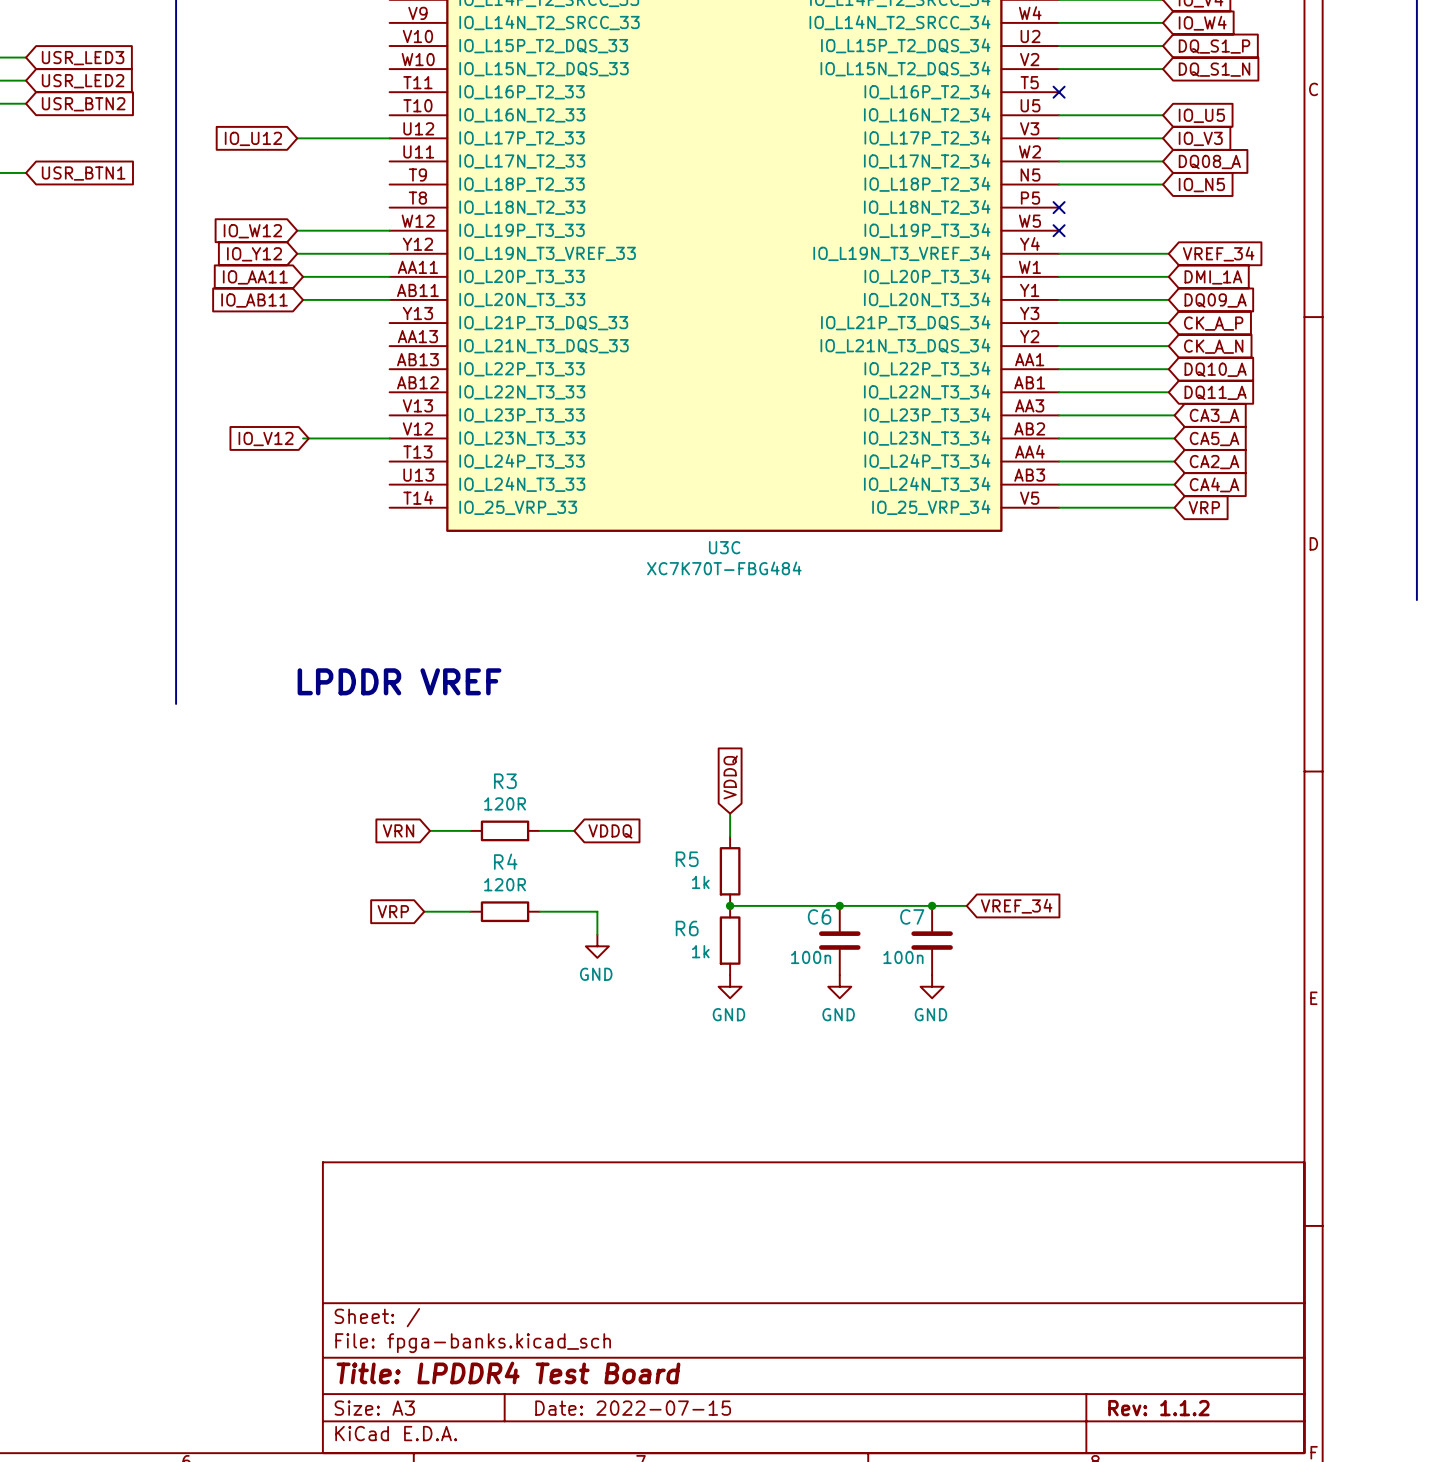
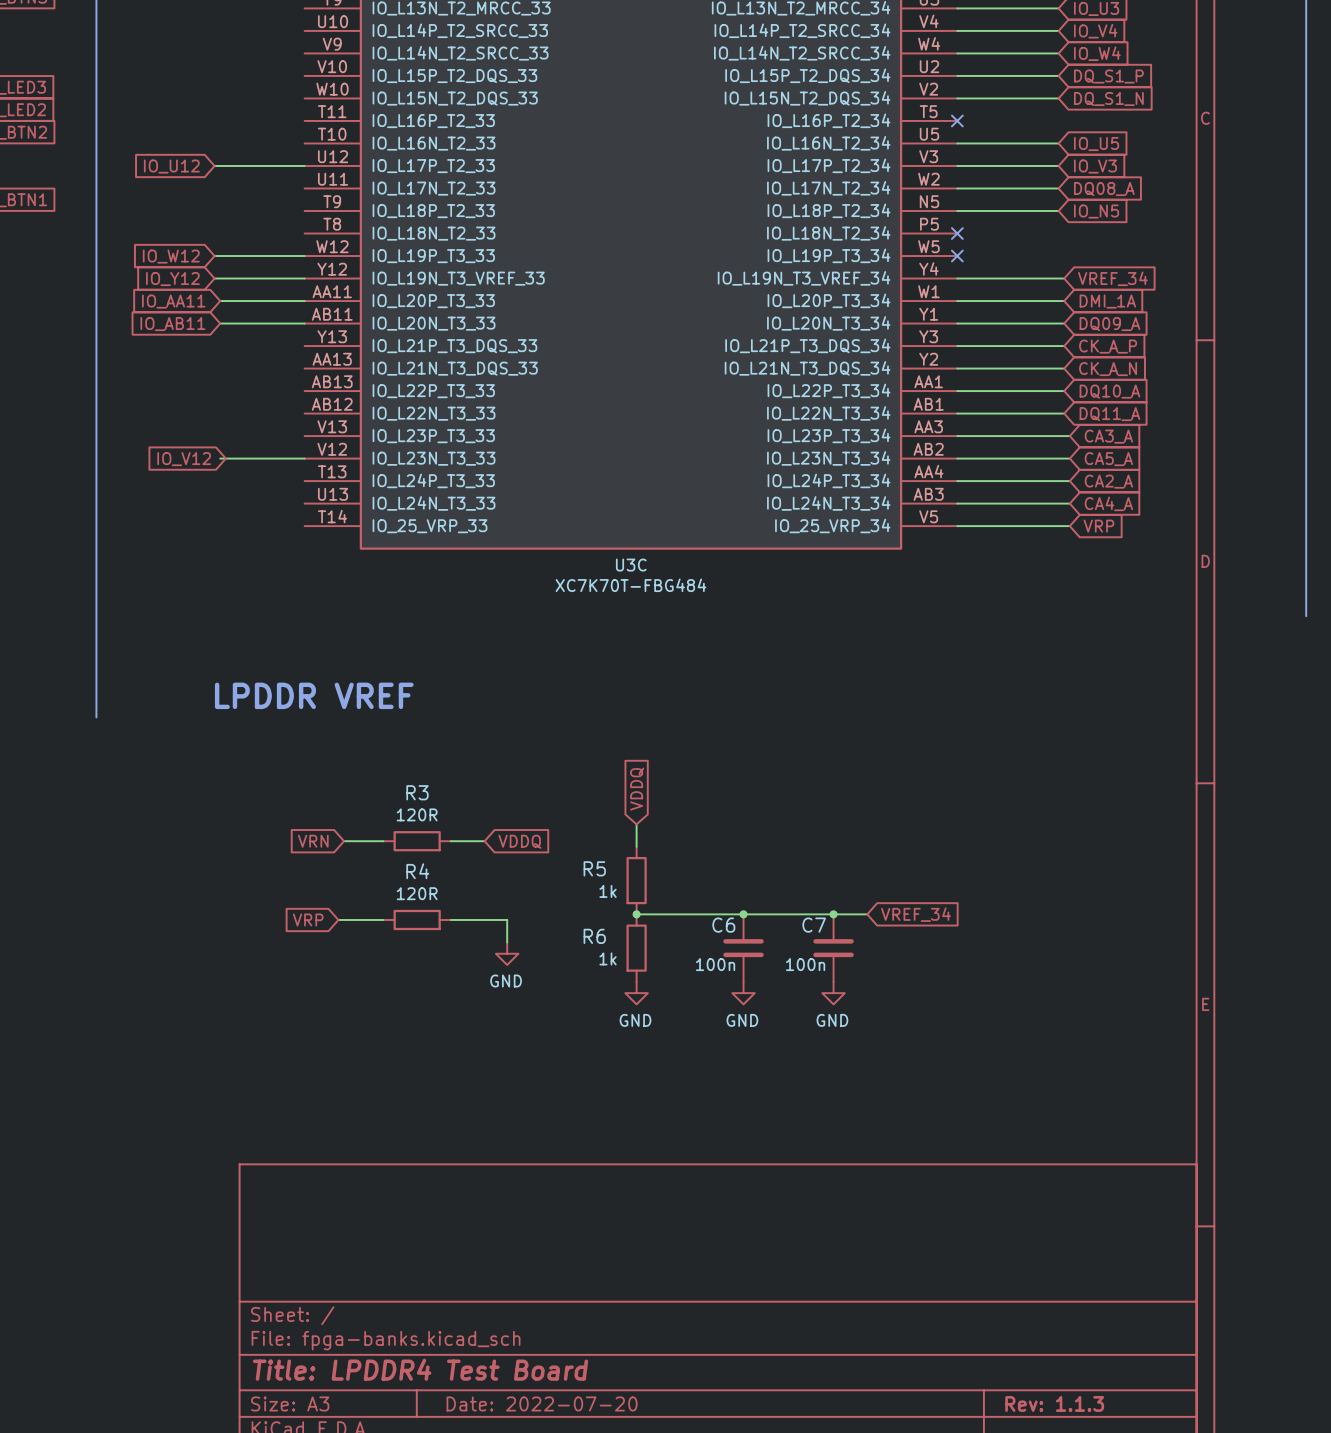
title block: Date: 2022-07-15 (633, 1408) -> Date: 2022-07-20 (542, 1403)
title block: Rev: 1.1.2 (1158, 1408) -> Rev: 1.1.3 (1054, 1403)

